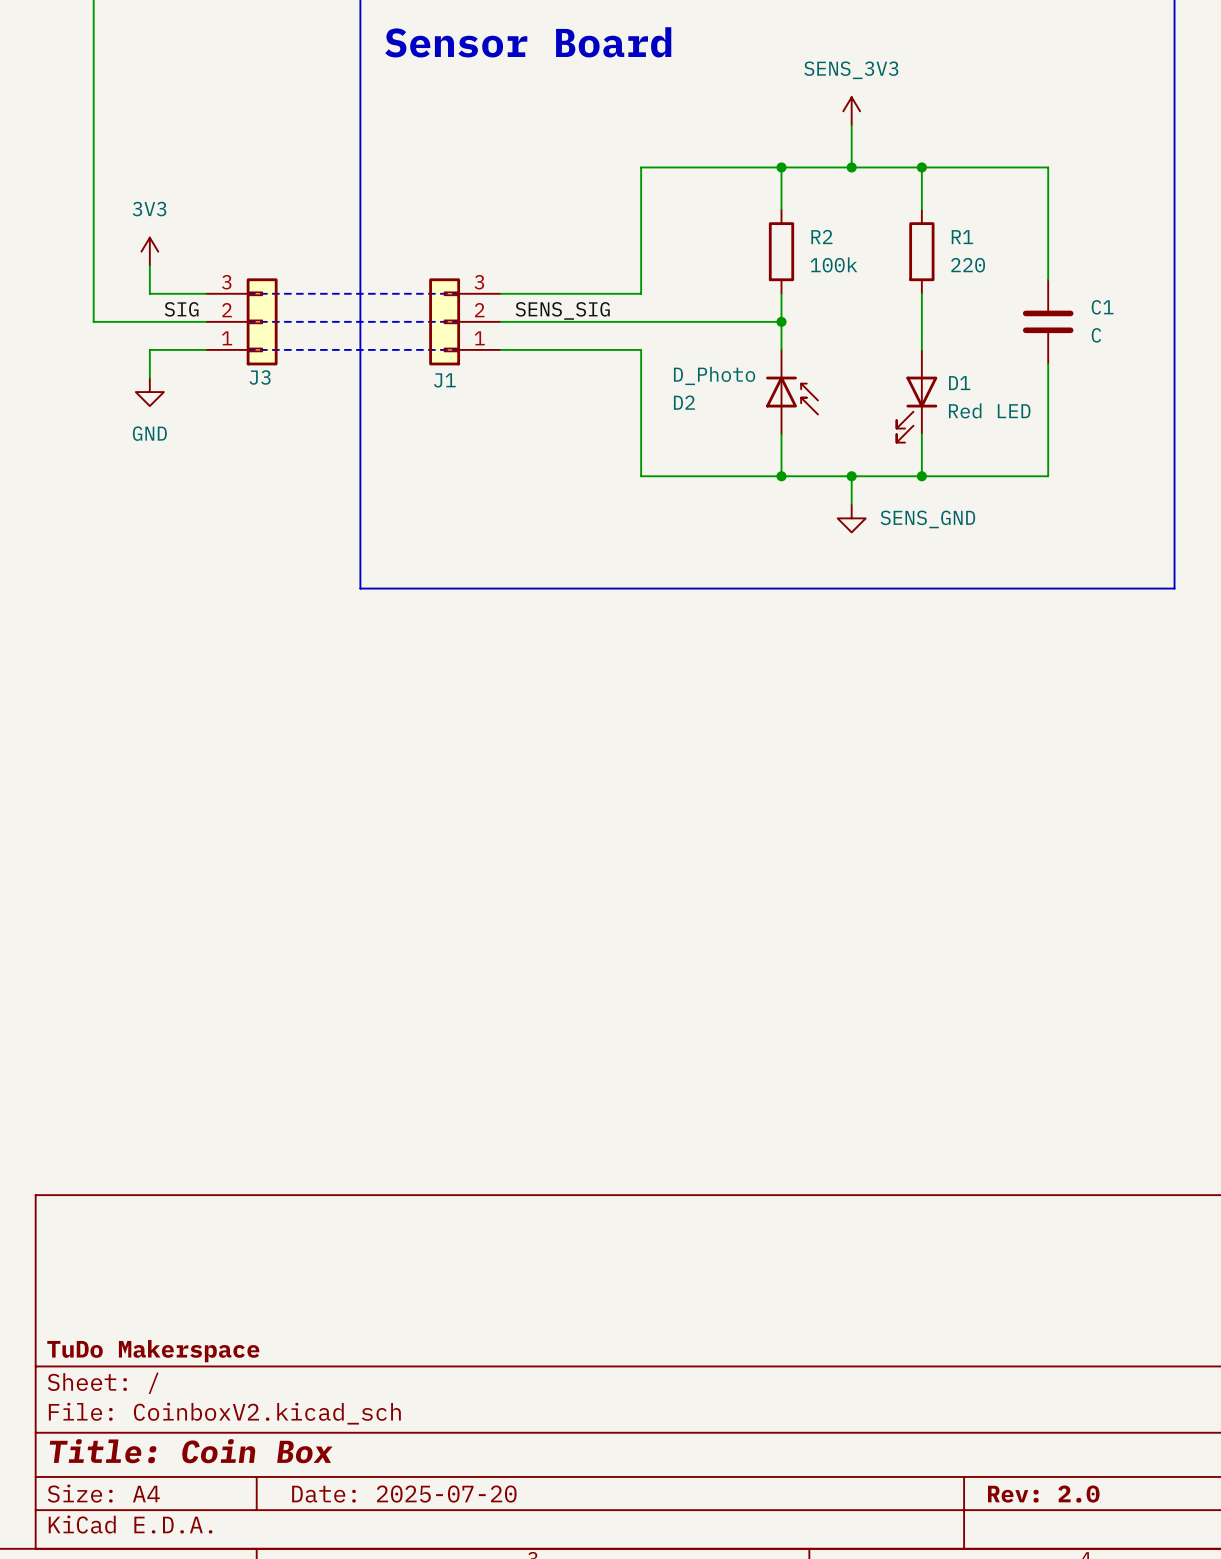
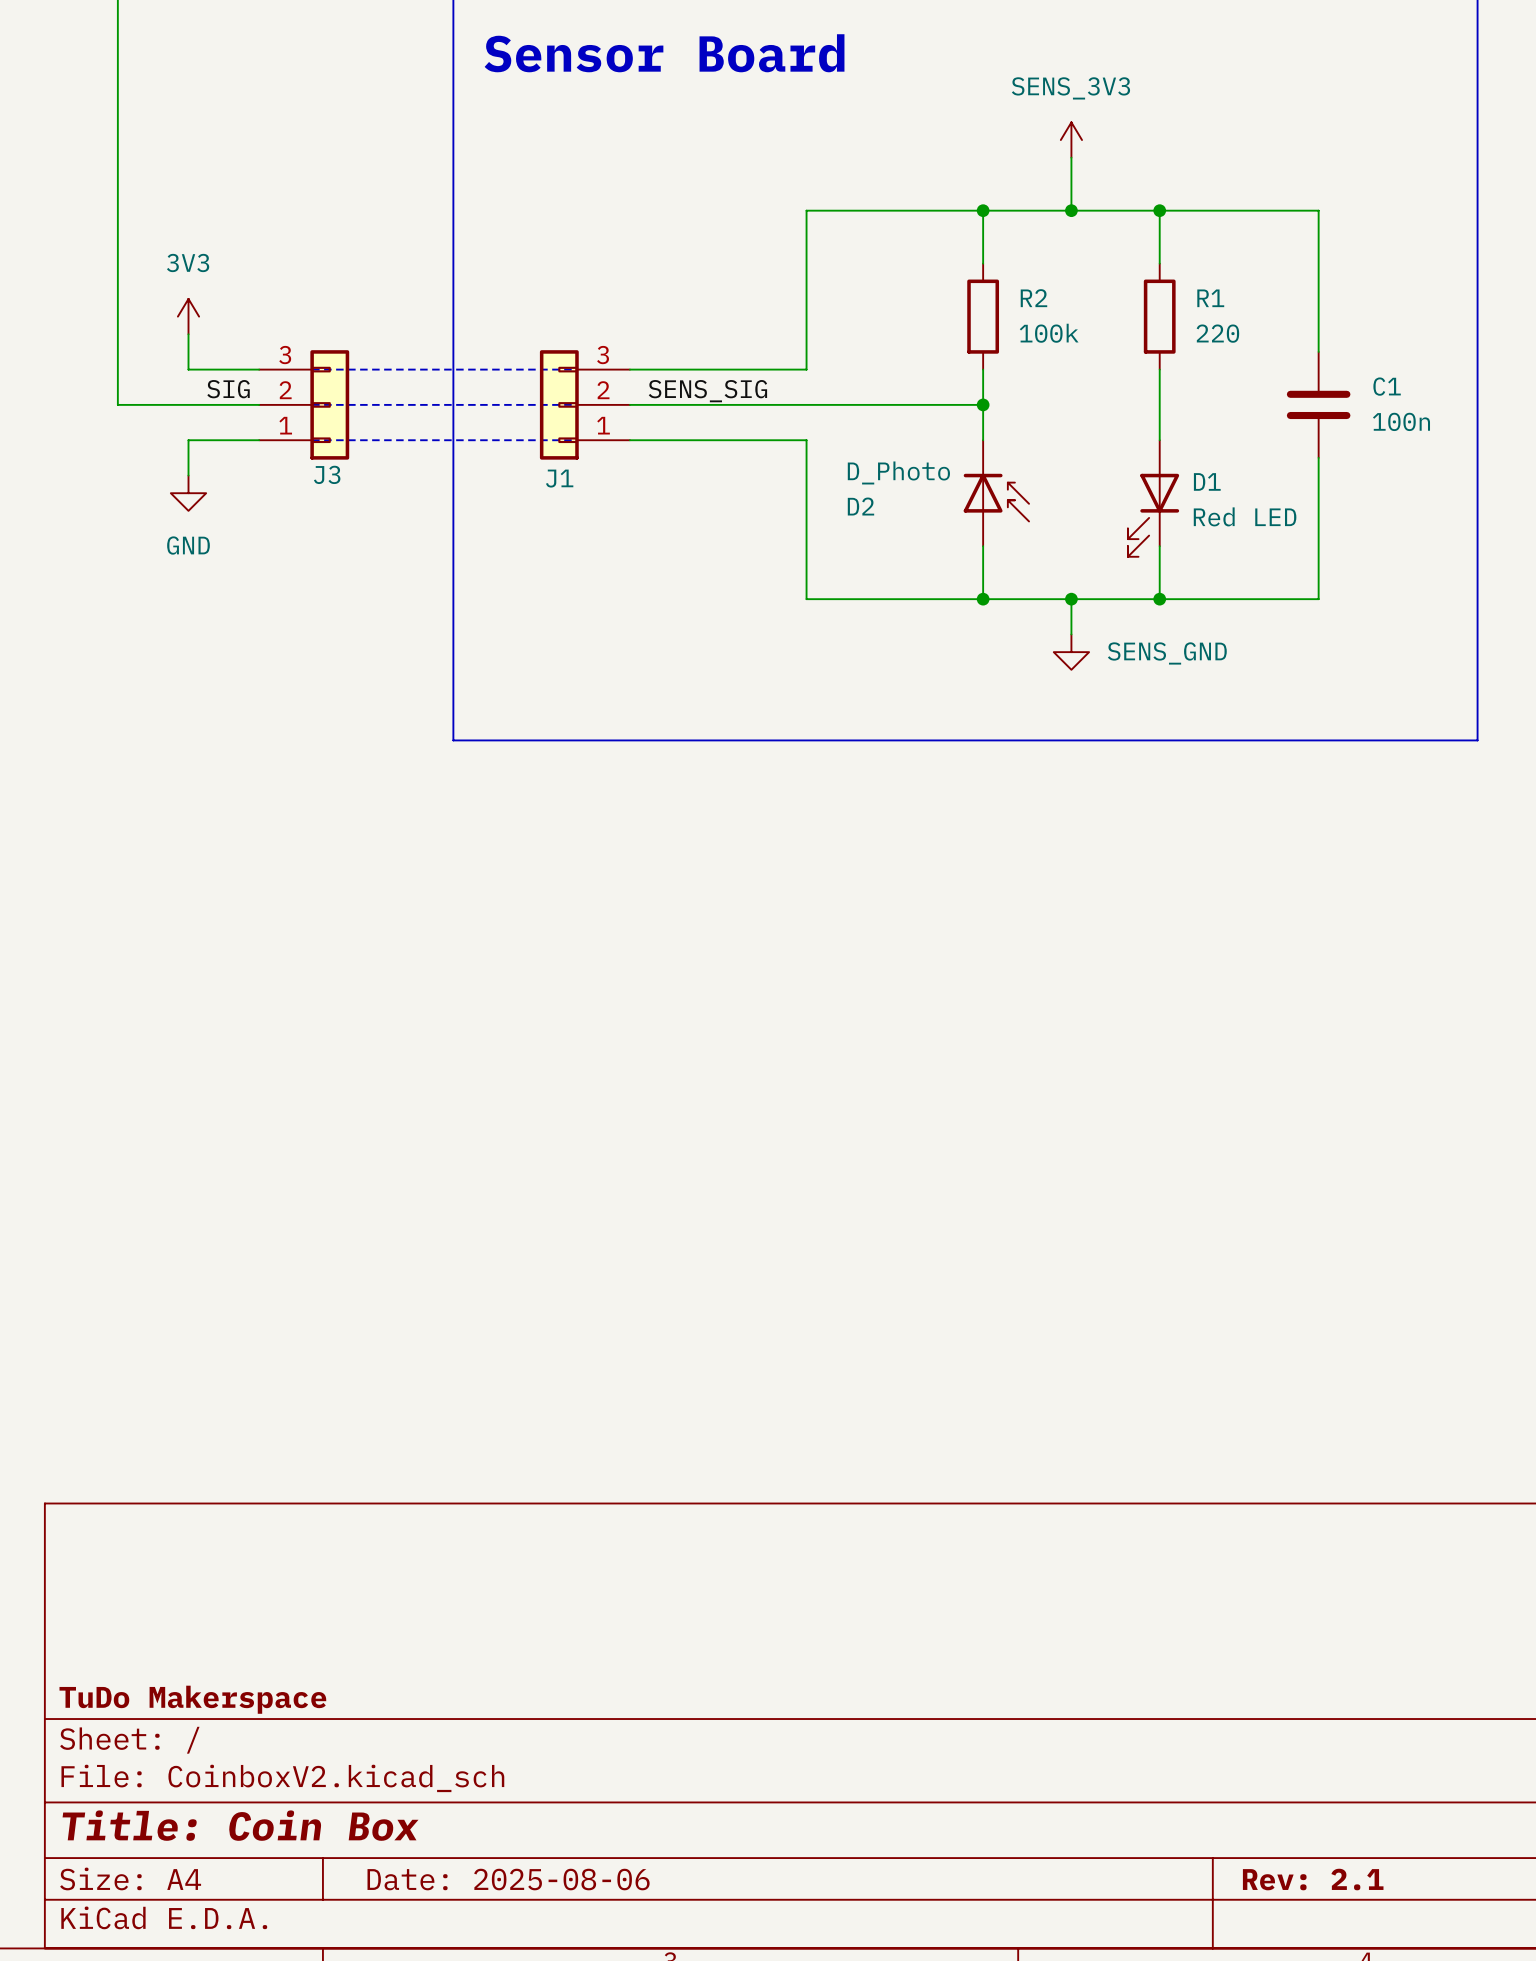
C1 value: C (1096, 335) -> 100n (1401, 421)
title block: Date: 2025-07-20 (404, 1494) -> Date: 2025-08-06 (508, 1879)
title block: Rev: 2.0 (1043, 1494) -> Rev: 2.1 (1313, 1879)

